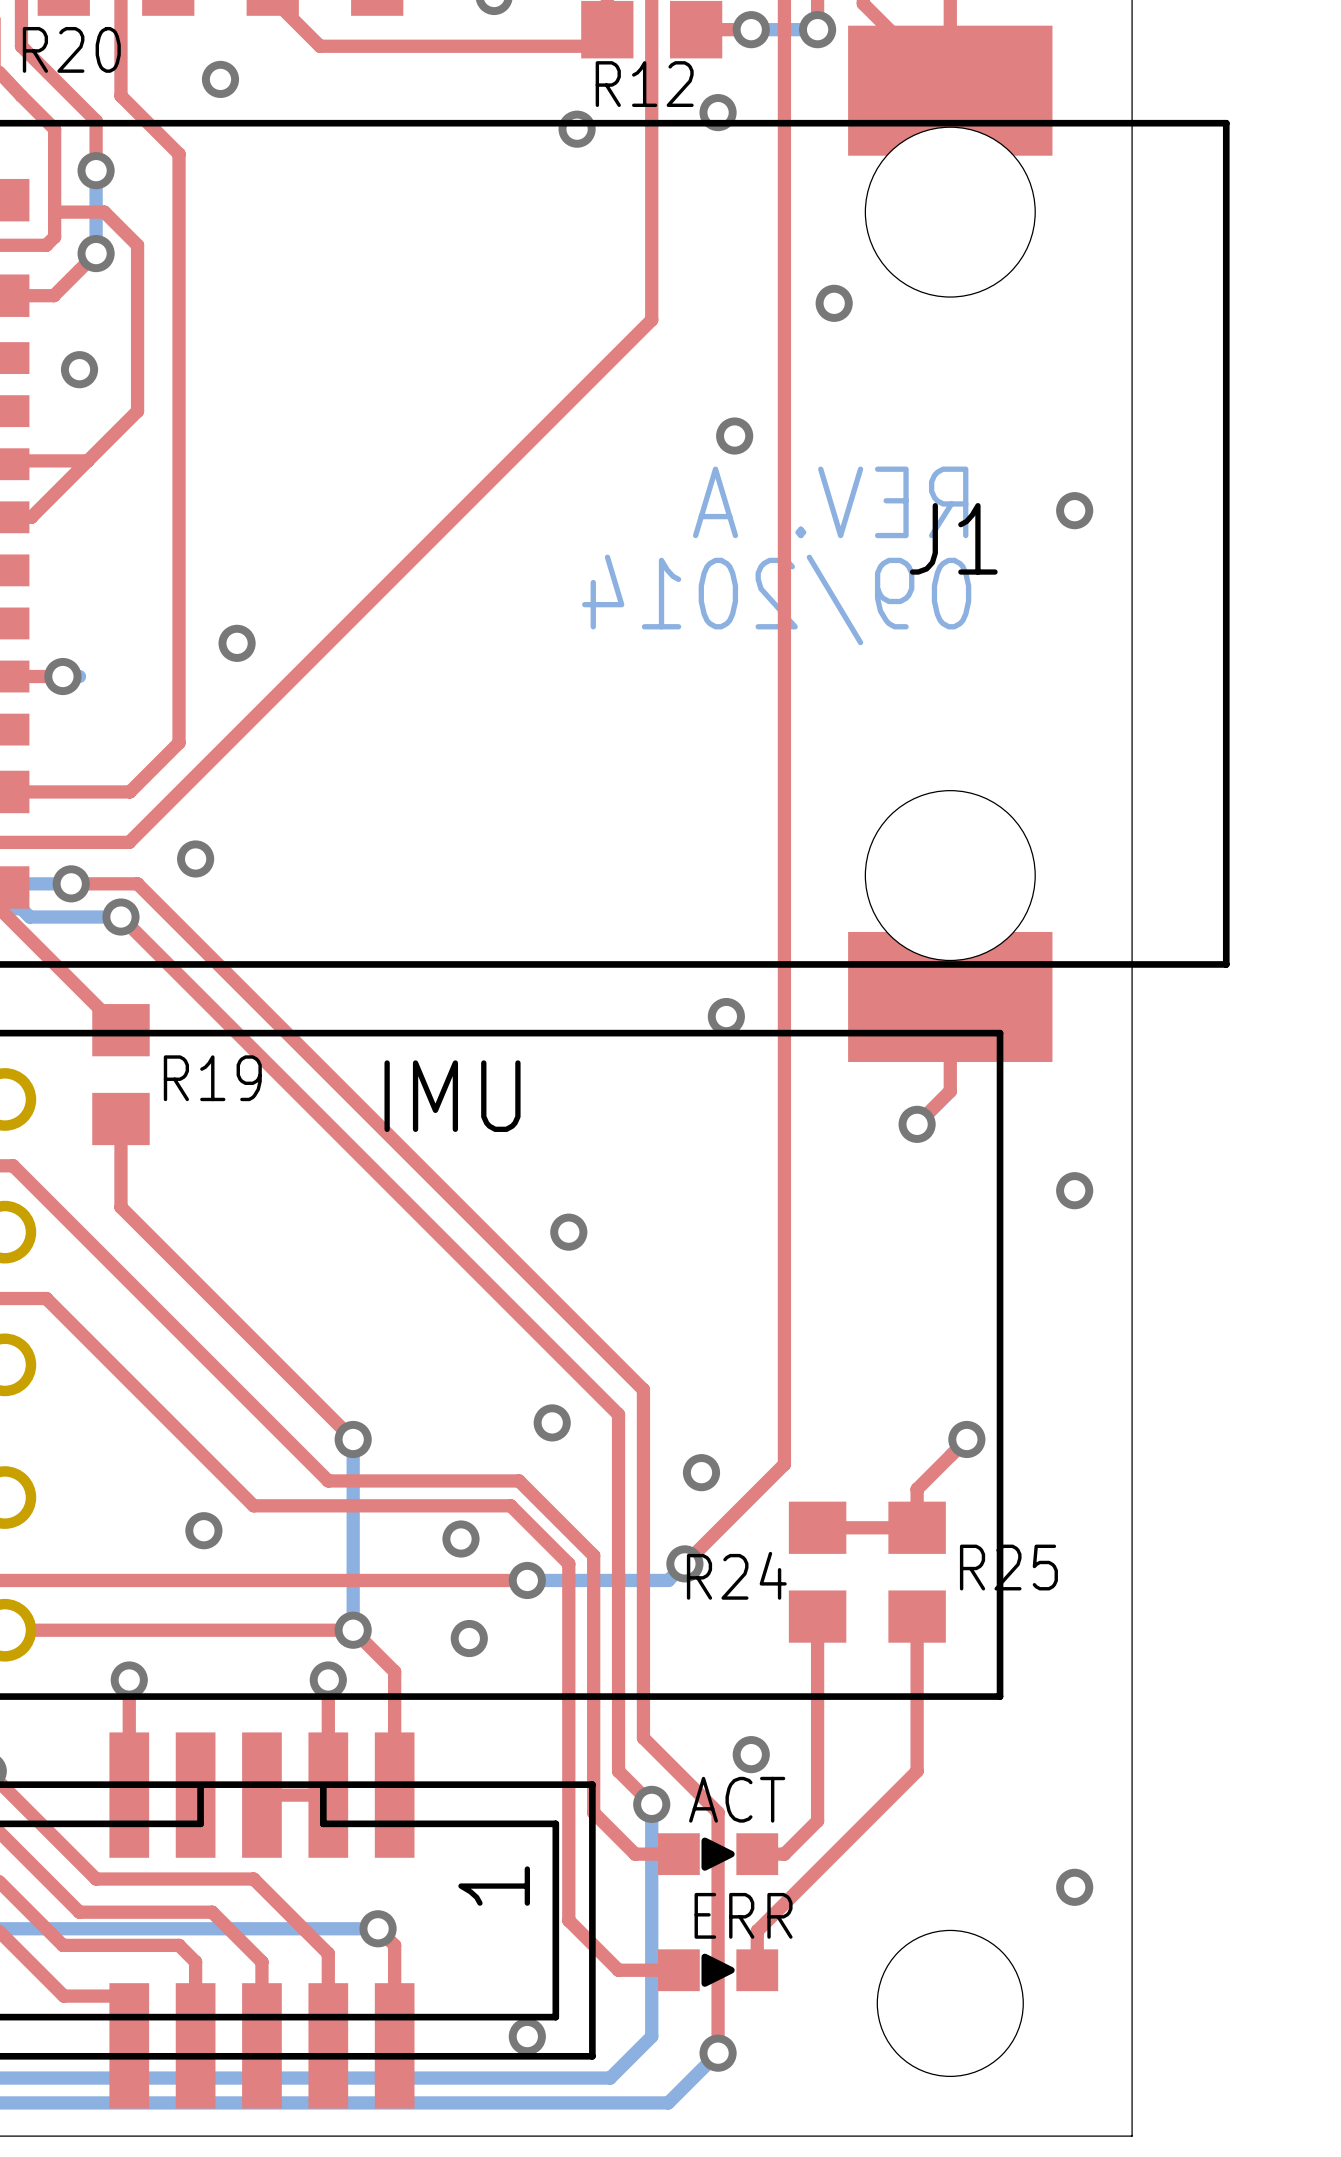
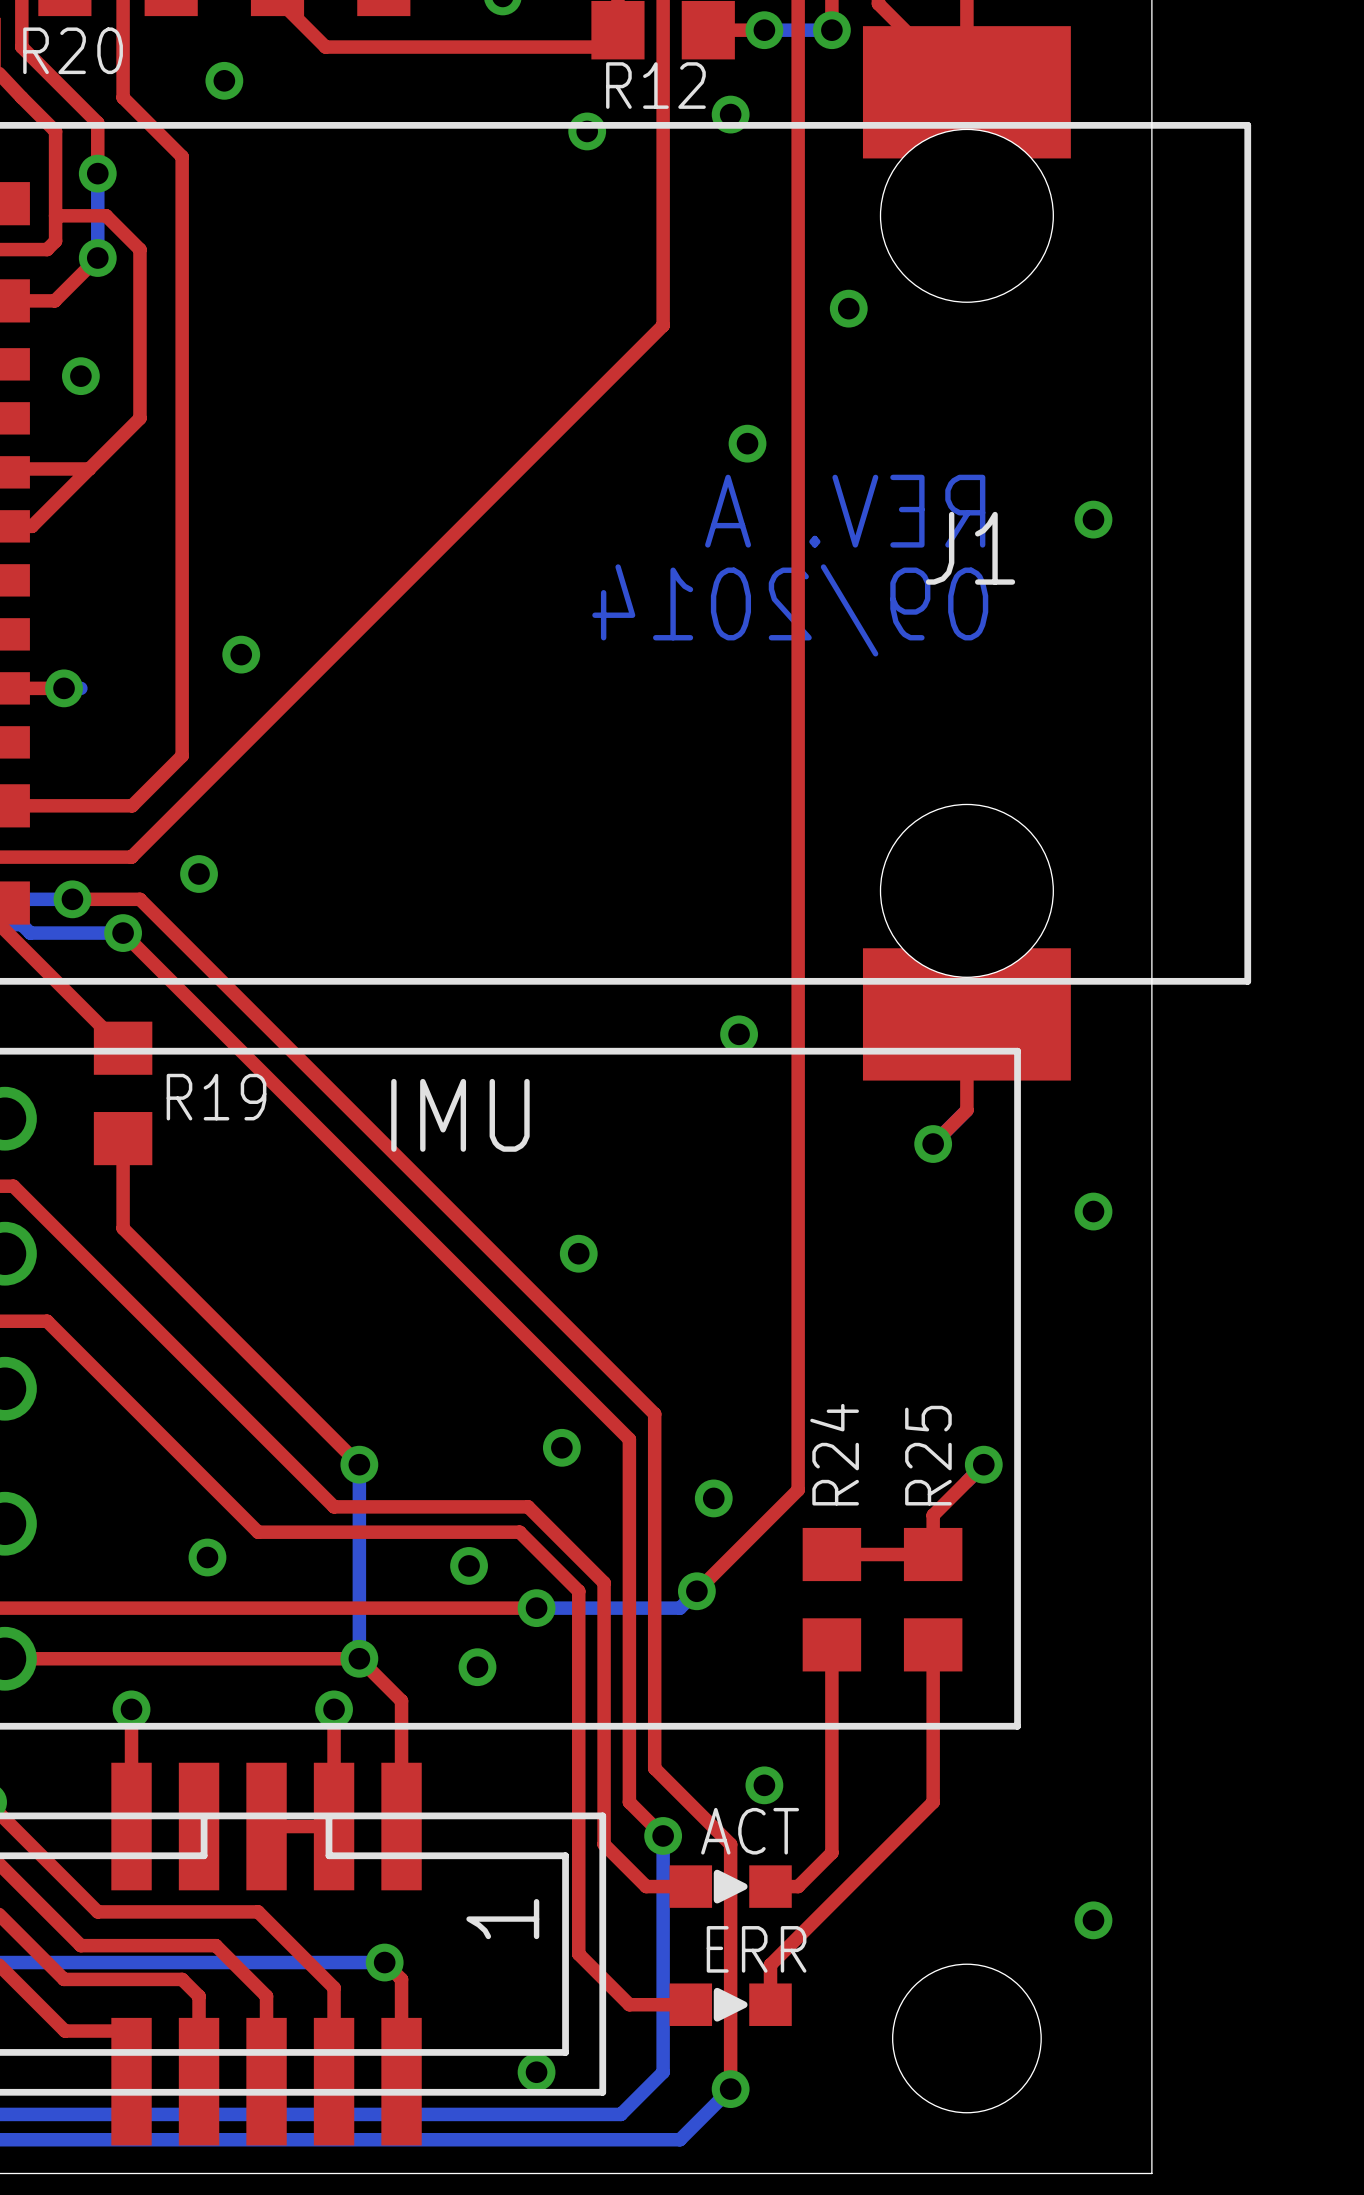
R25 name rotation: 0° (1008, 1567) -> 90° counterclockwise (928, 1455)
R25 name position: R25 (1008, 1567) -> R25 (928, 1455)
R24 name rotation: 0° (736, 1575) -> 90° counterclockwise (834, 1454)
R24 name position: R24 (736, 1575) -> R24 (834, 1454)

